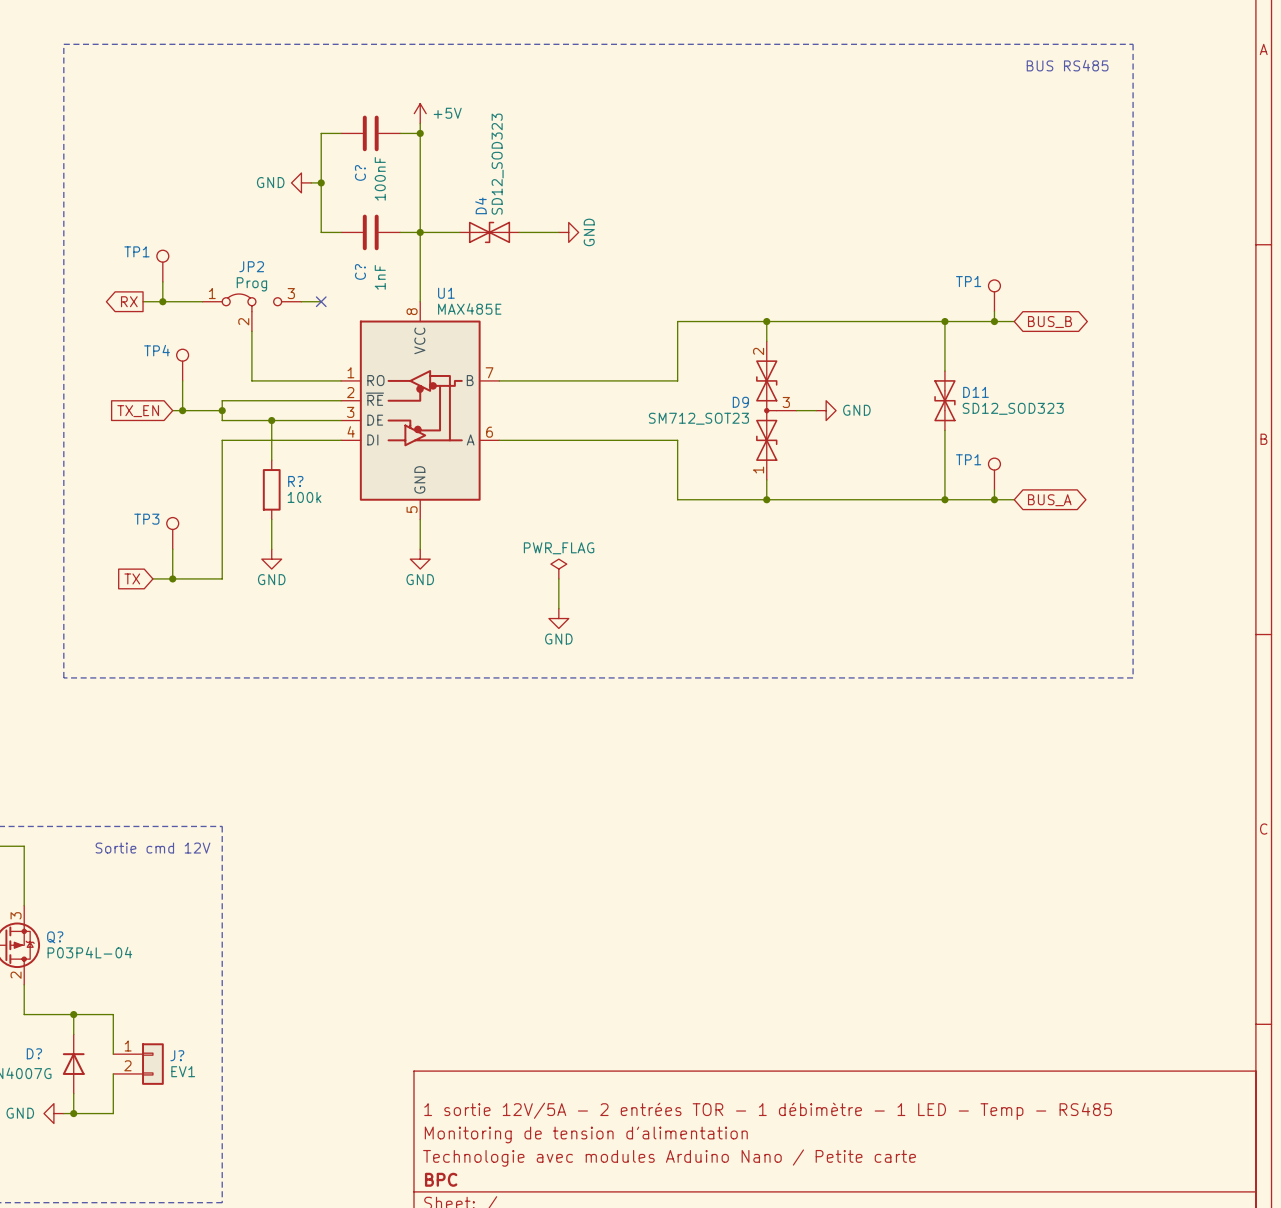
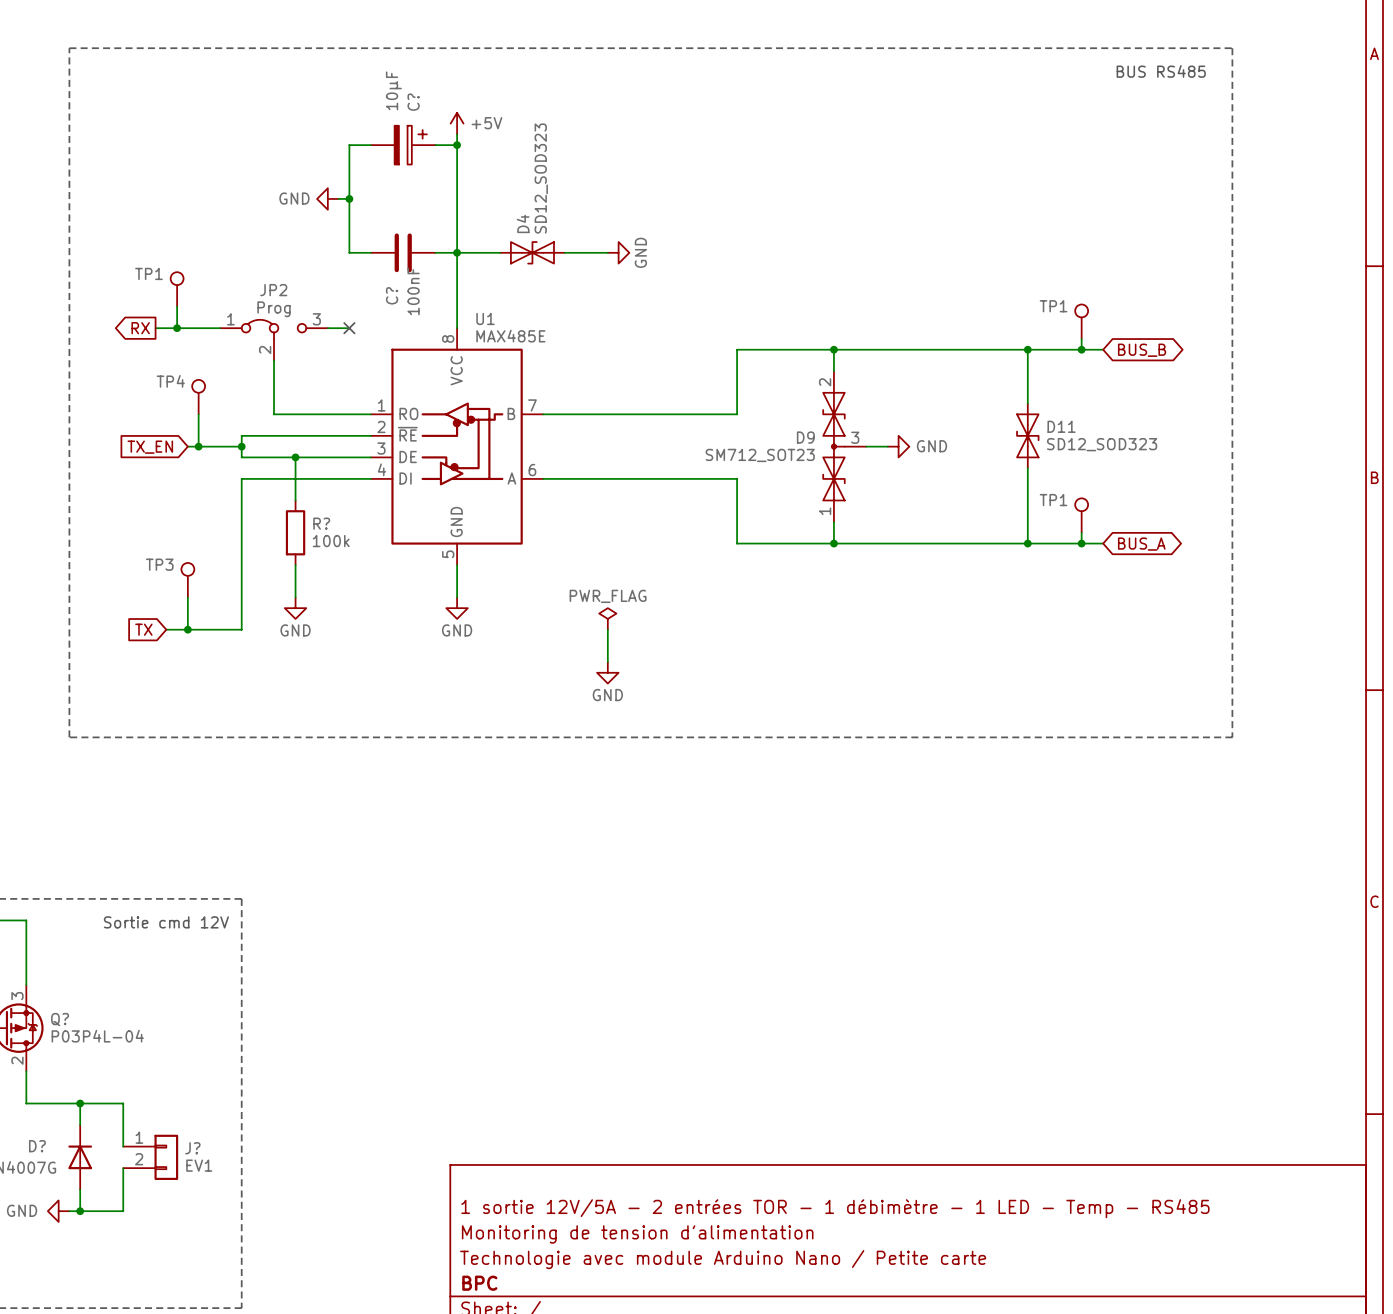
C? symbol: [341, 115, 401, 152] -> [370, 125, 436, 165]
C? name position: C? (360, 172) -> C? (413, 102)
C? value: 100nF (380, 178) -> 10µF (393, 90)
C? value: 1nF (380, 277) -> 100nF (413, 291)
title block: Technologie avec modules Arduino Nano / Petite carte (669, 1158) -> Technologie avec module Arduino Nano / Petite carte (723, 1259)

